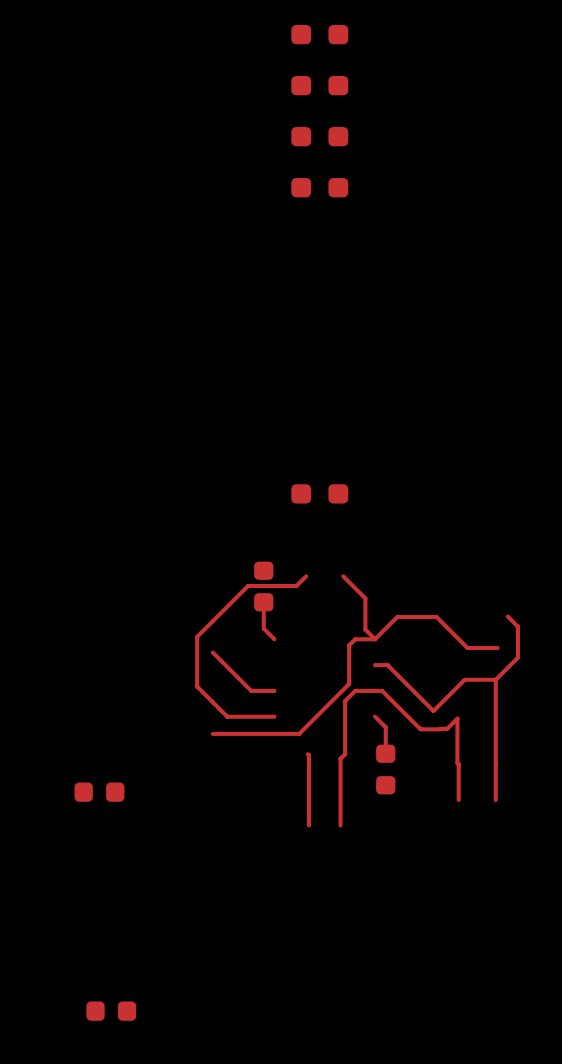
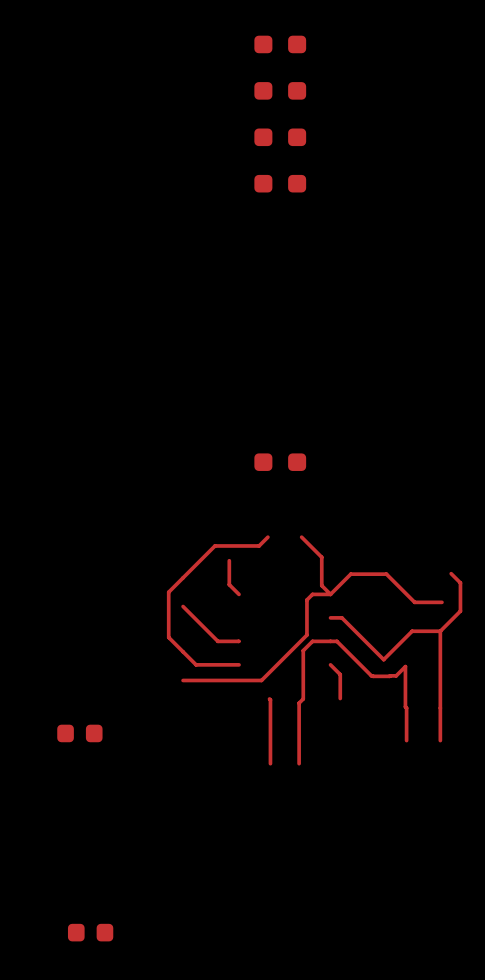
part: (263, 586) -> none
part: (385, 769) -> none

